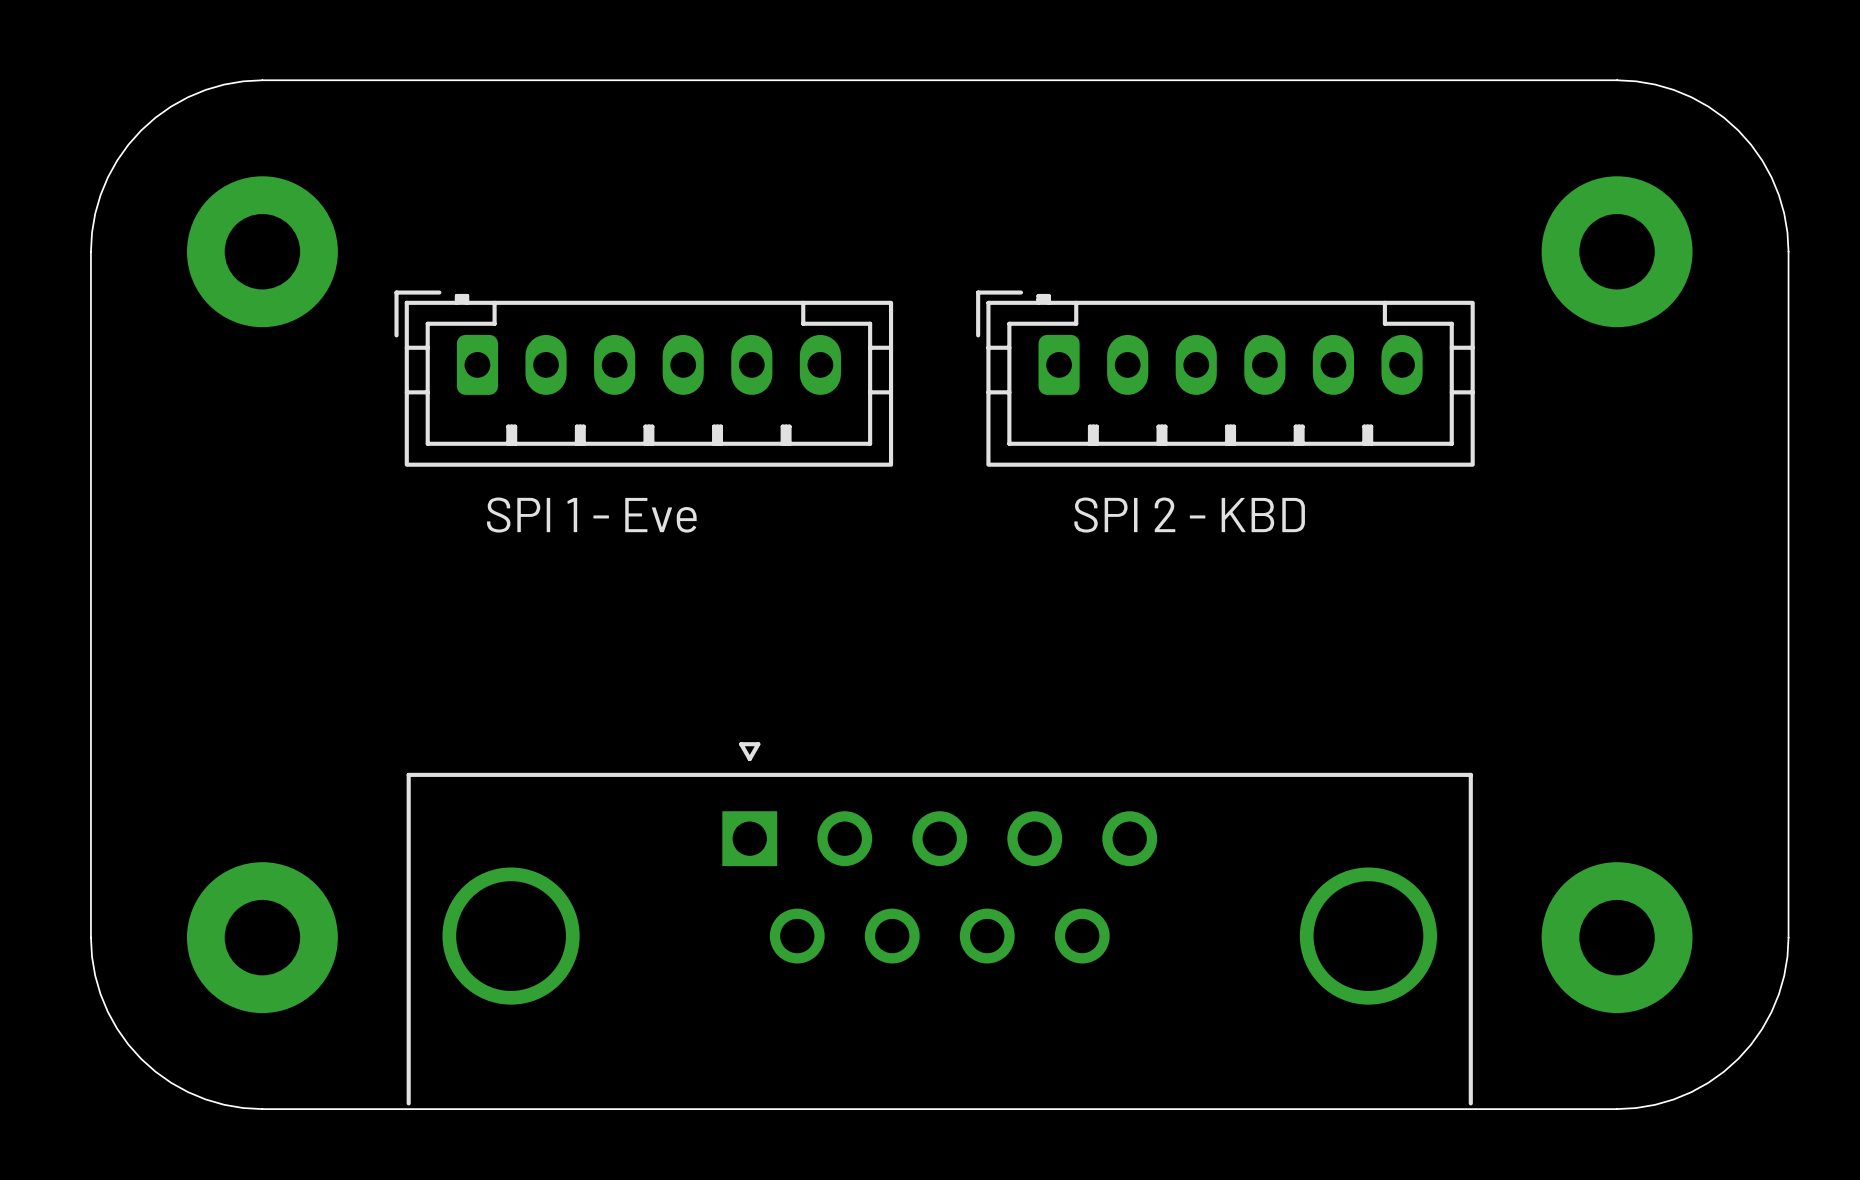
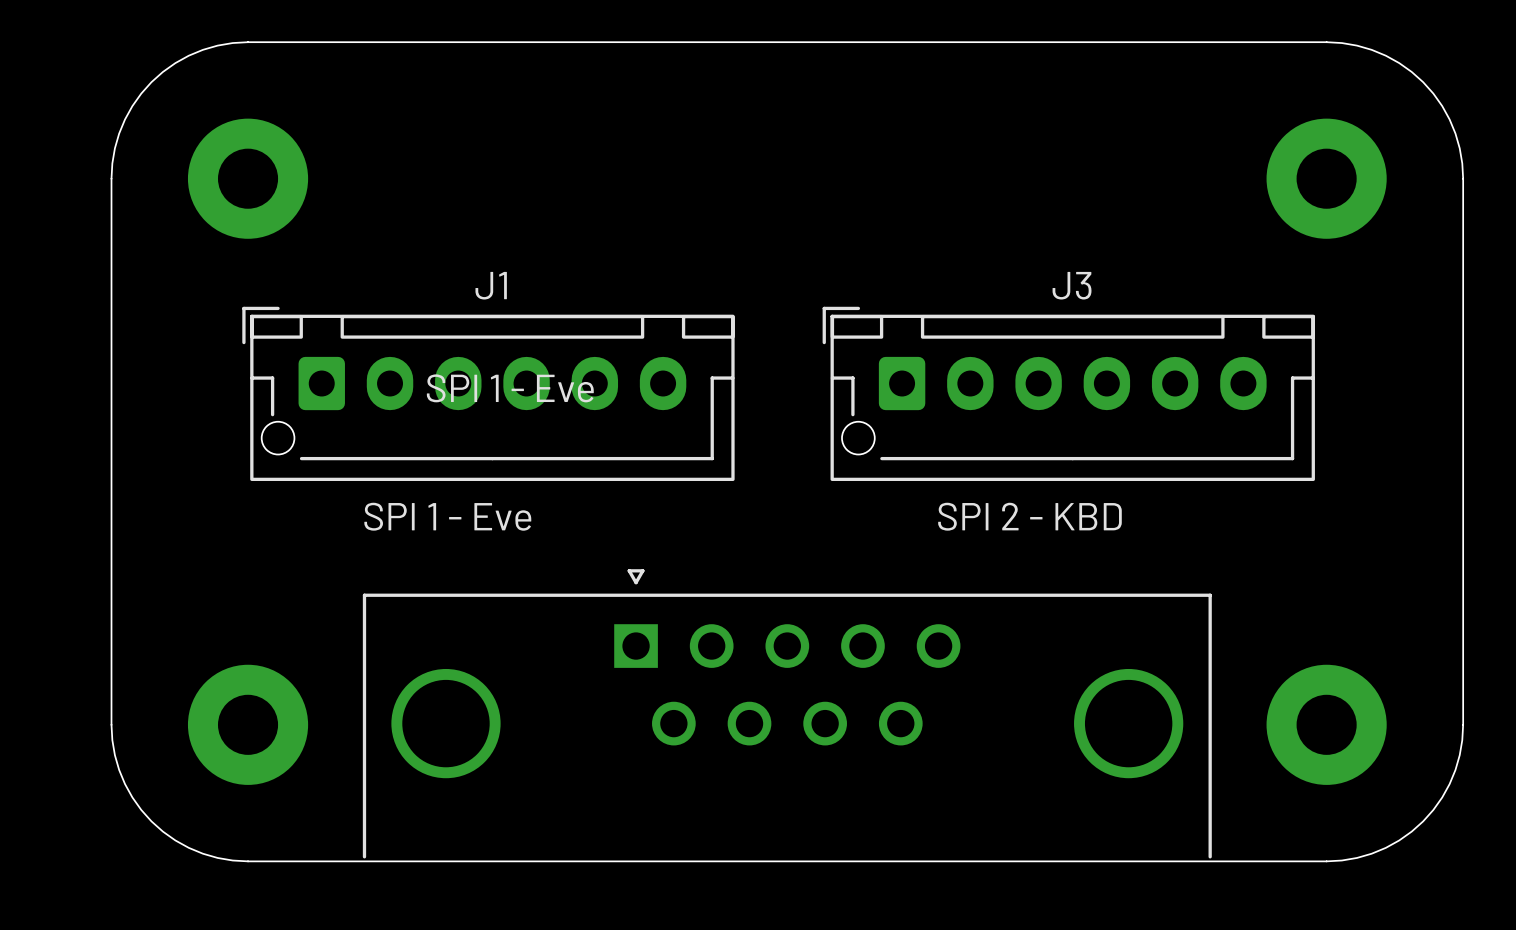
part: (643, 378) -> none
part: (1225, 378) -> none
text position: SPI 2 - KBD (1189, 515) -> SPI 2 - KBD (1029, 516)
J1: none -> (488, 393)
J3: none -> (1068, 393)
text: none -> SPI 1 - Eve (447, 516)

